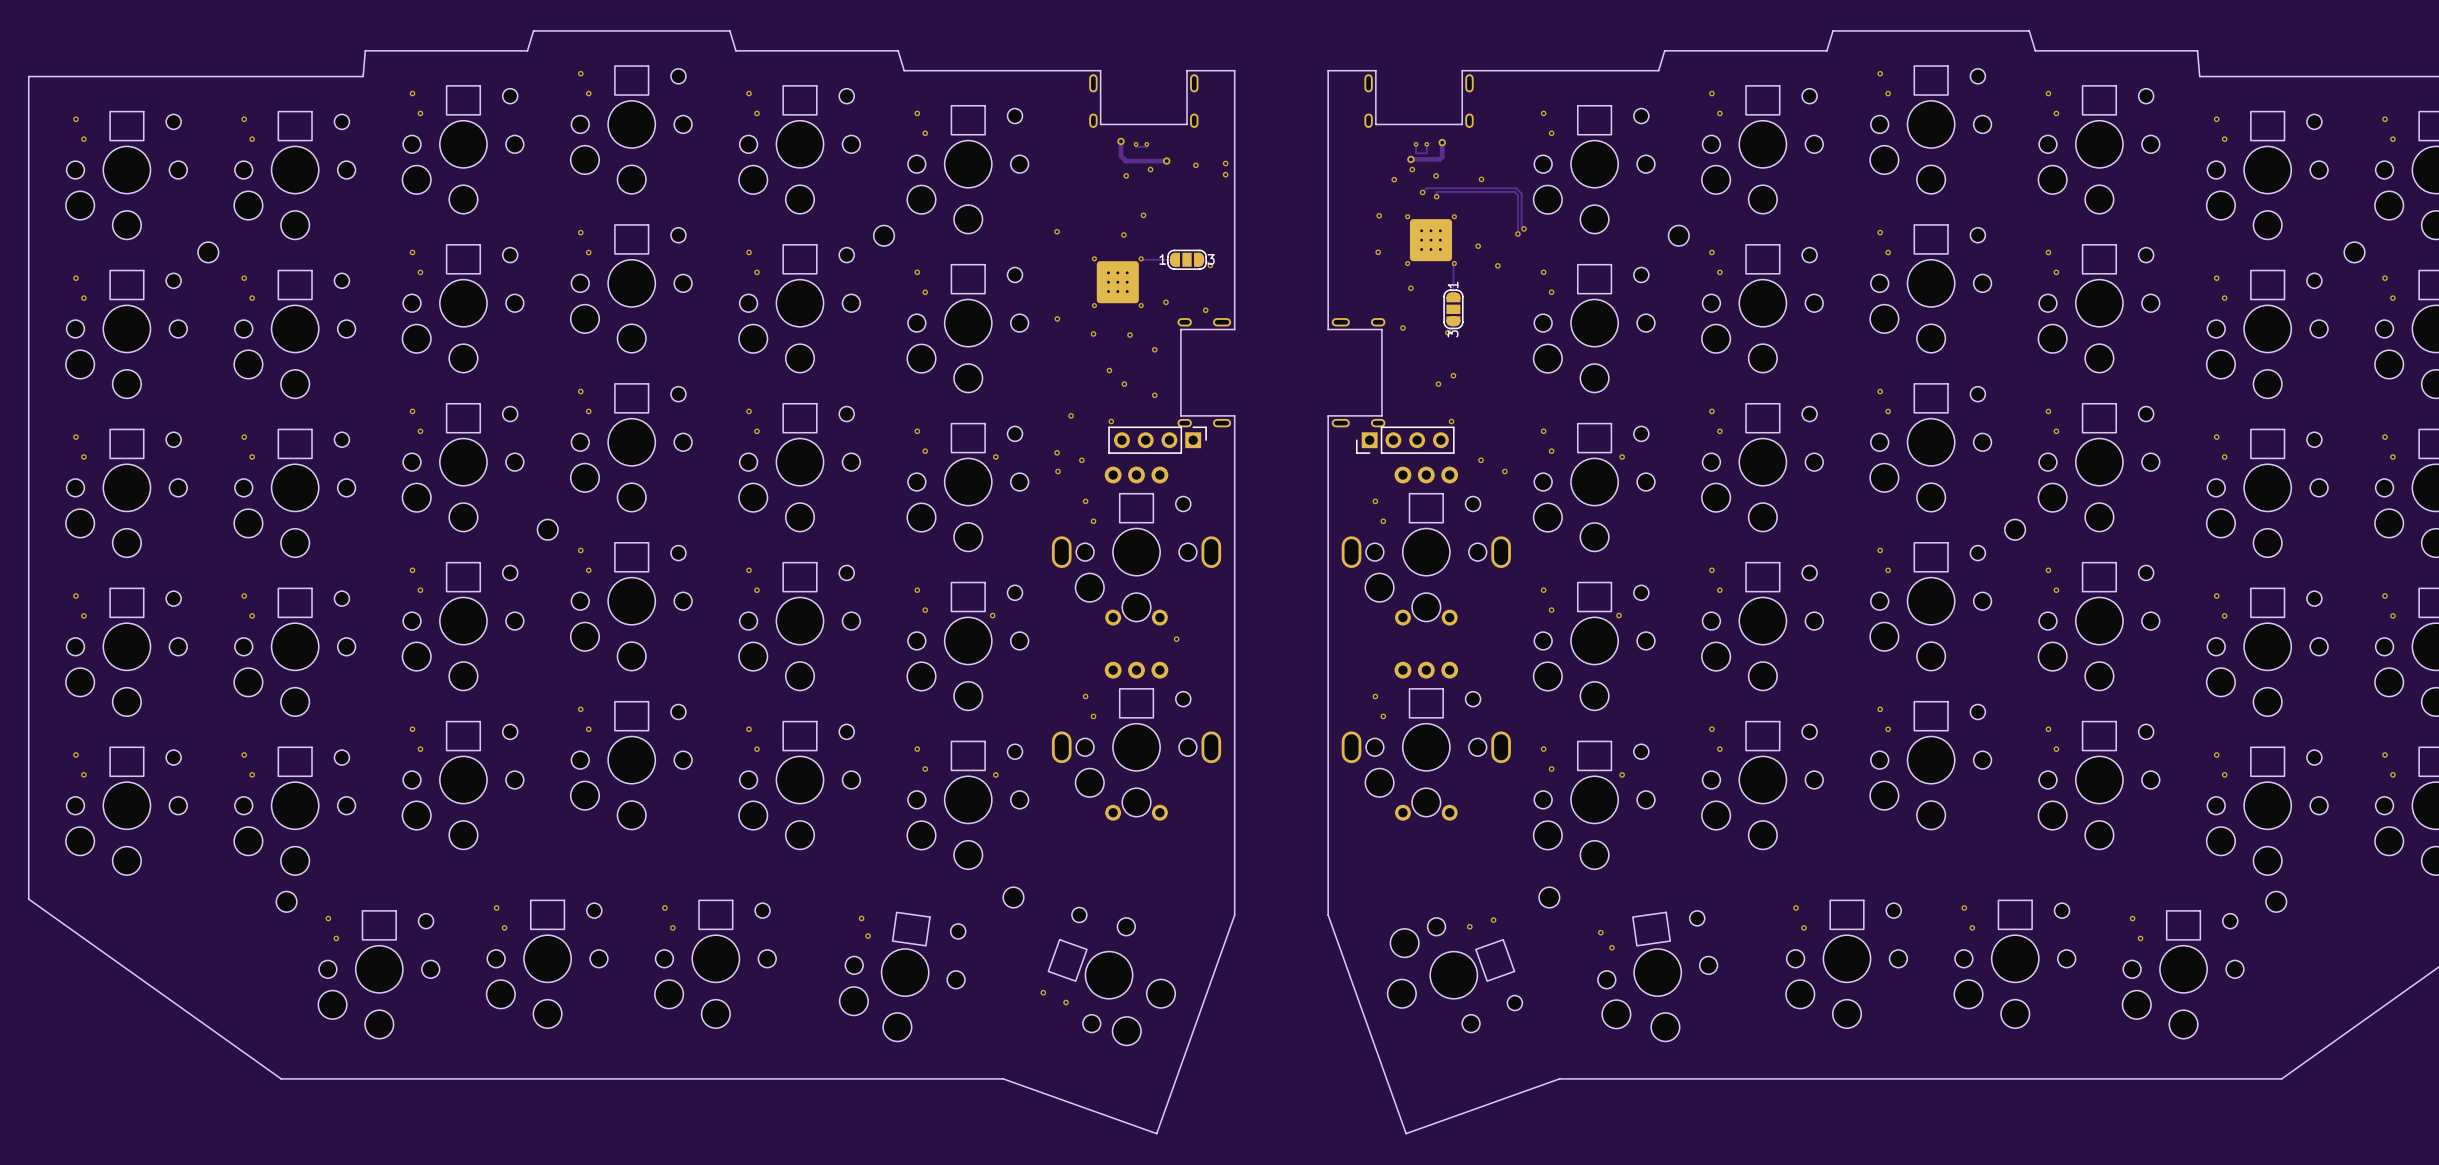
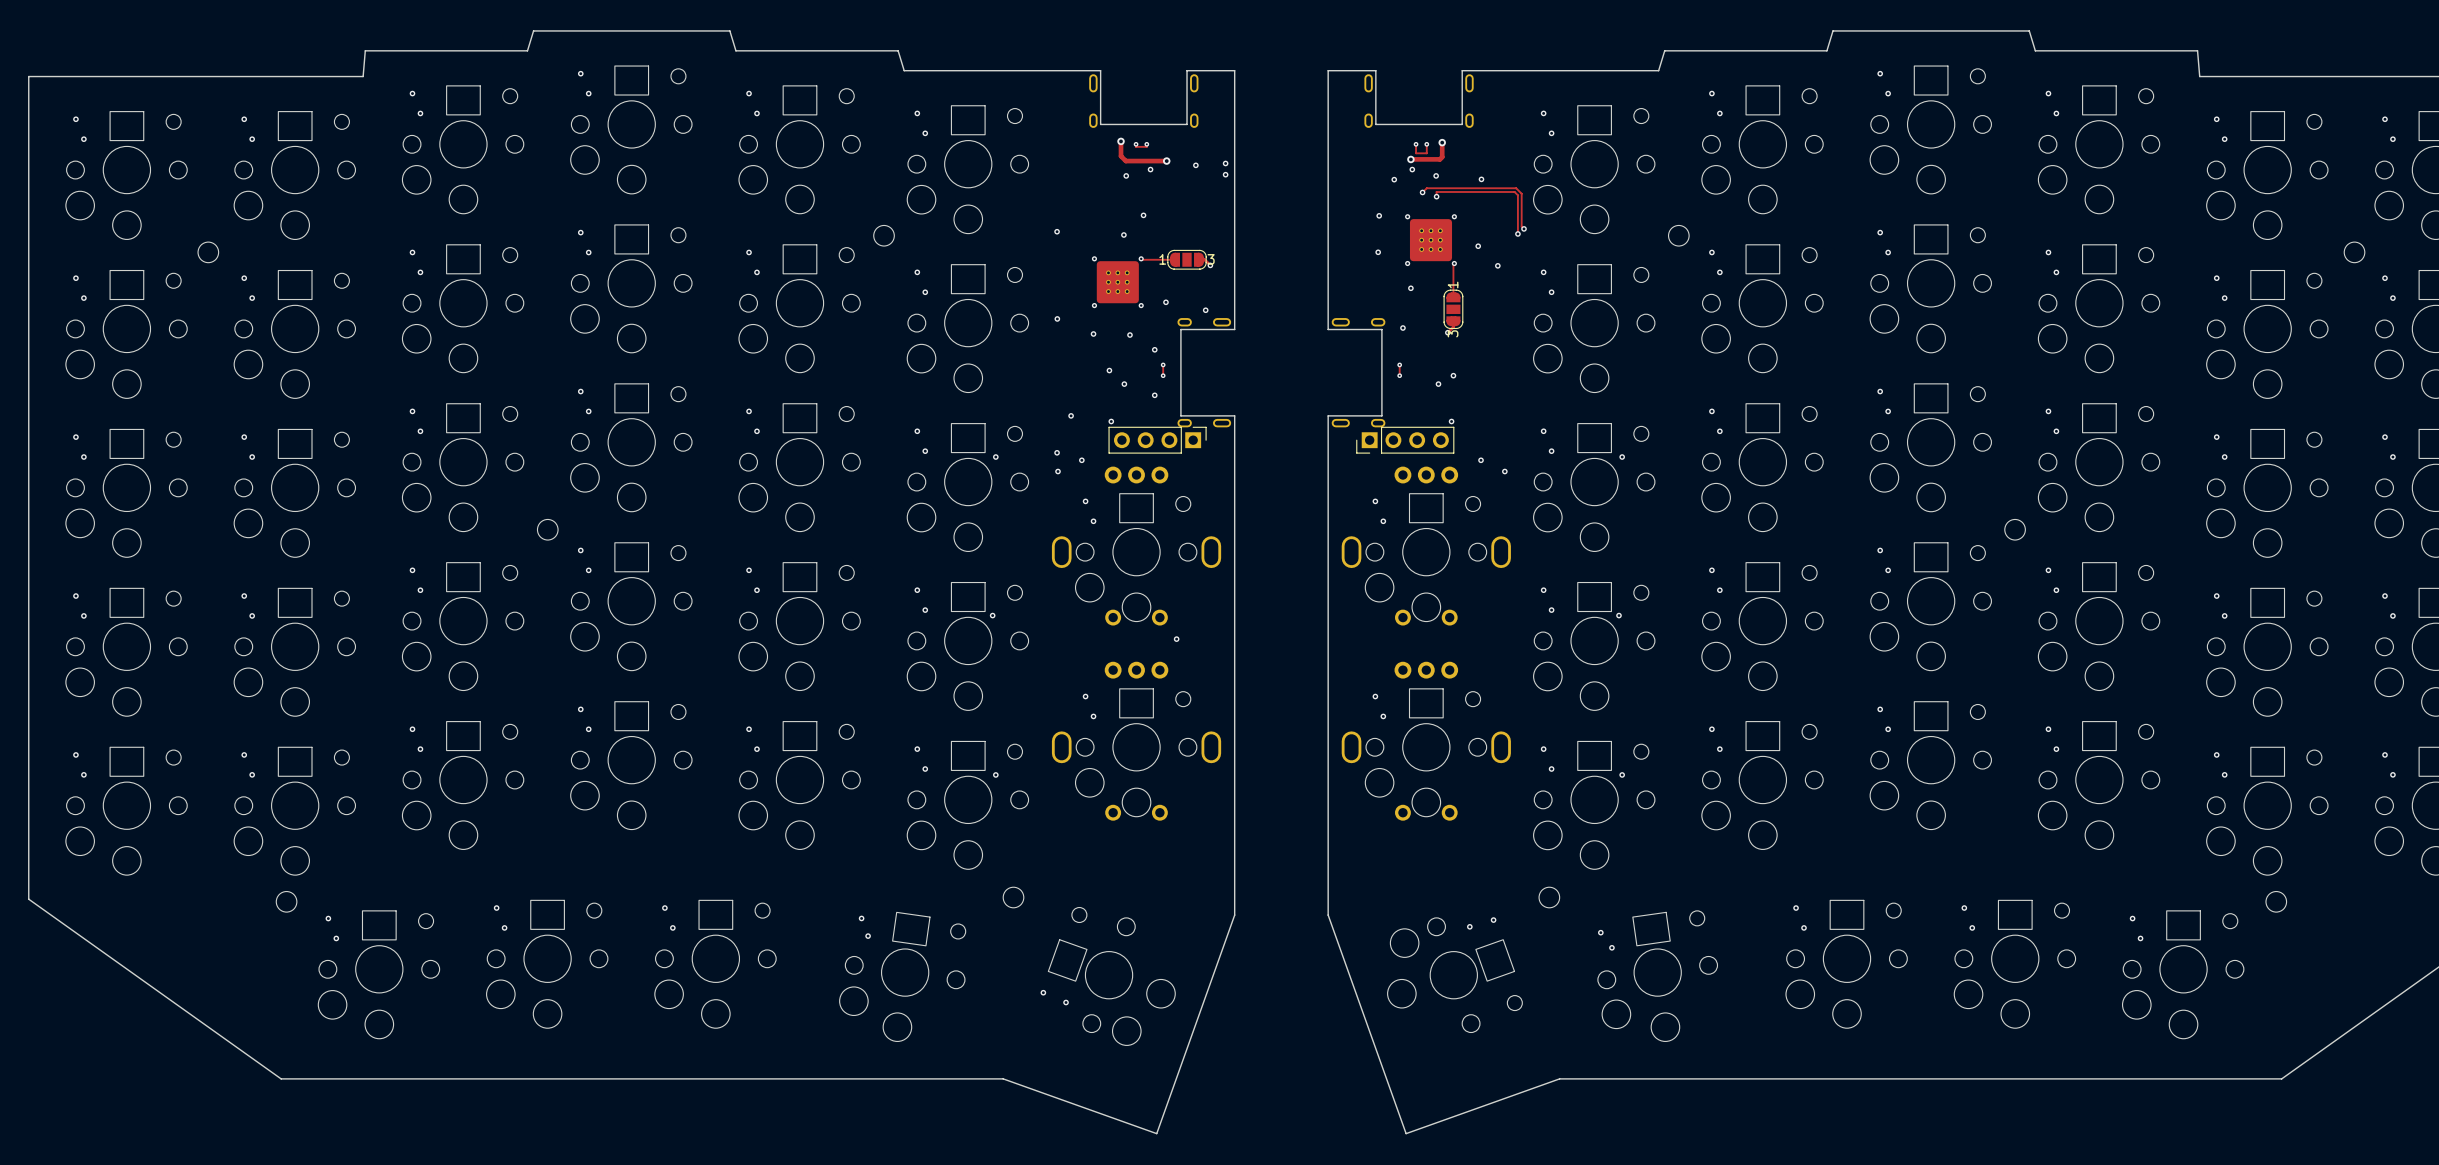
track: none -> (1163, 364) (1163, 375)
via: none -> (1163, 364)
track: none -> (1399, 364) (1399, 375)
via: none -> (1399, 364)
via: none -> (1163, 375)
via: none -> (1399, 375)

